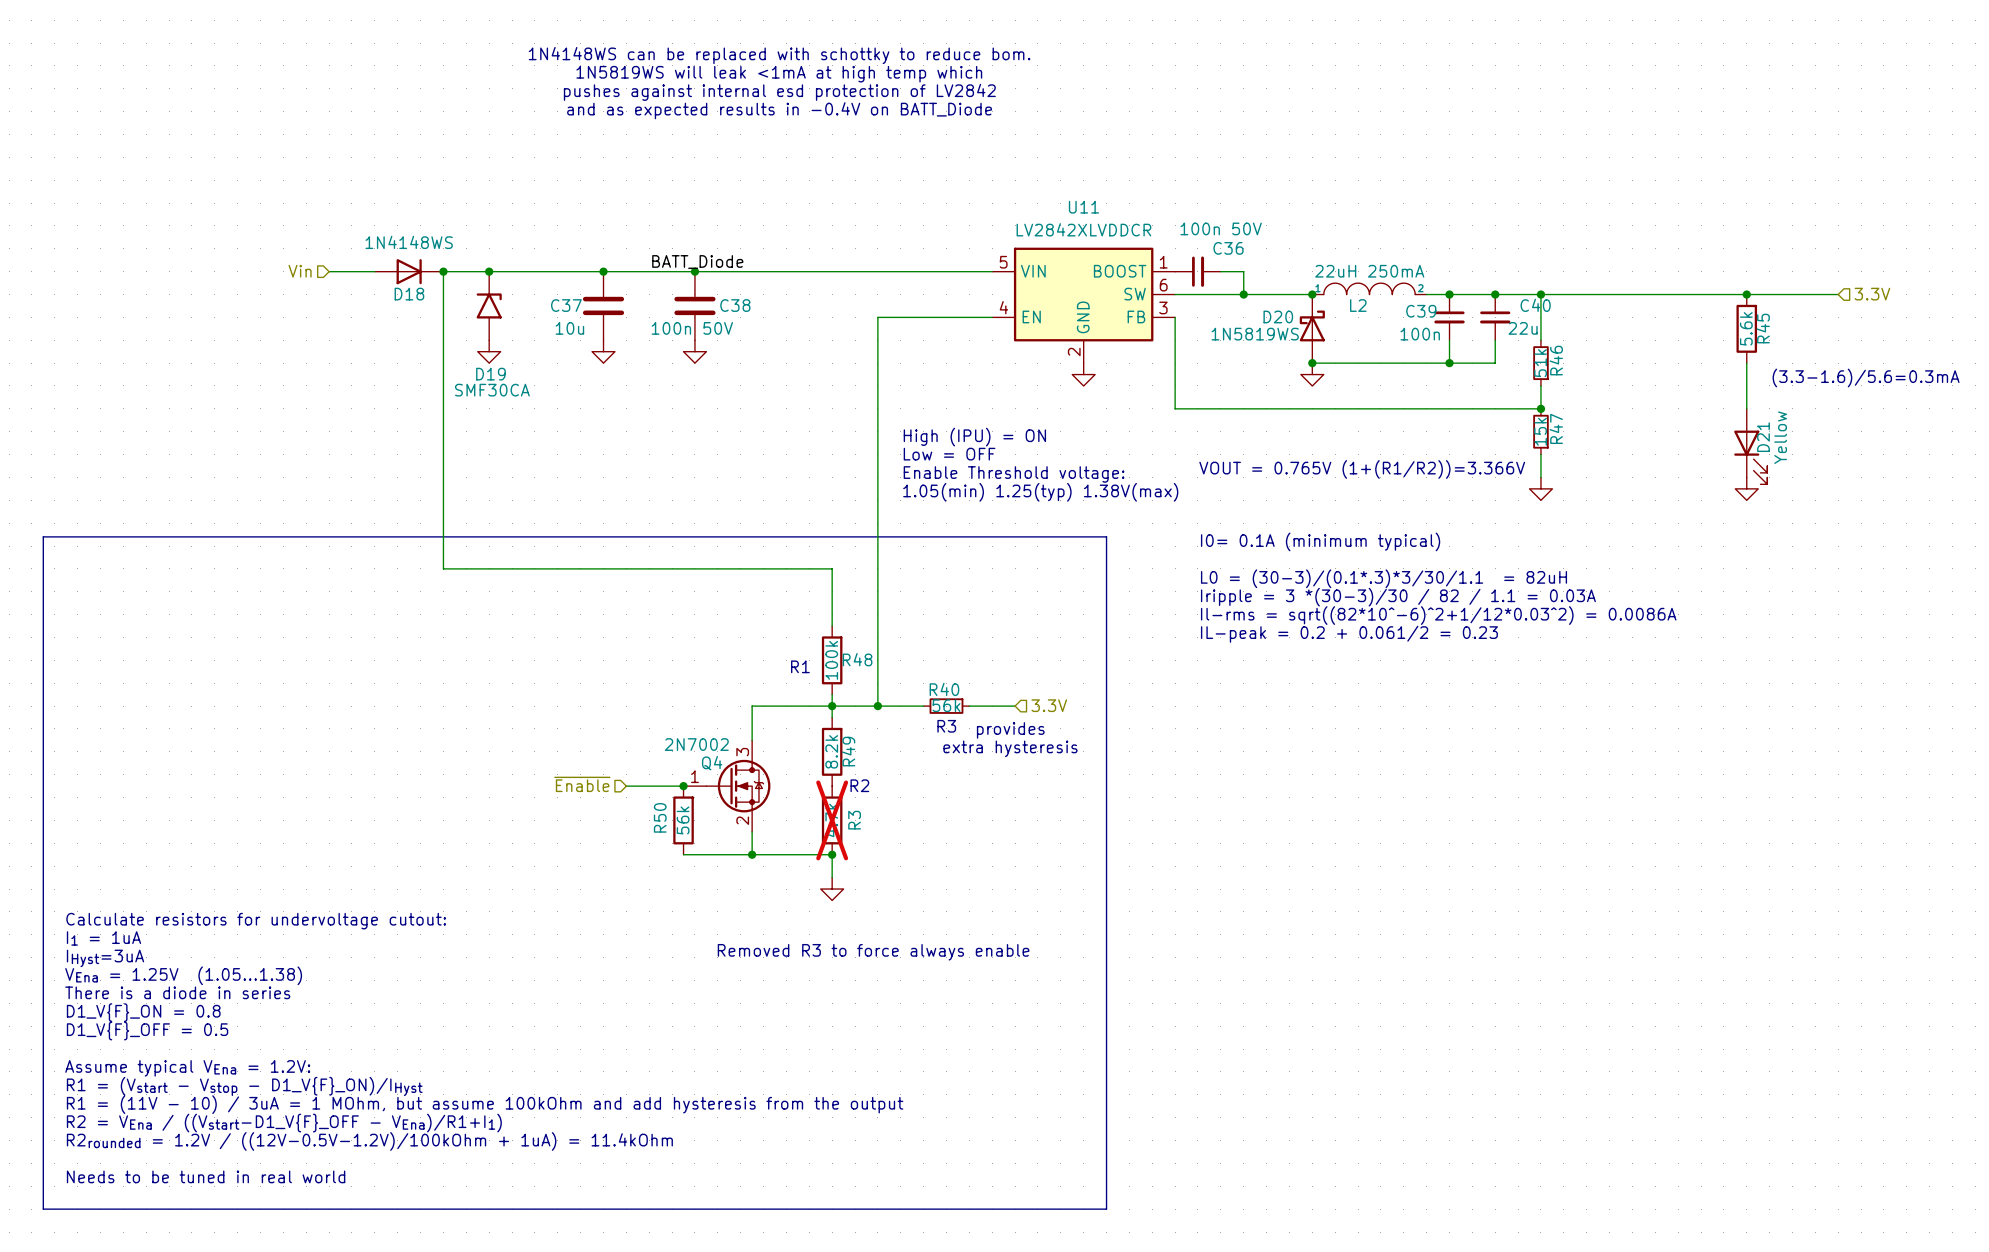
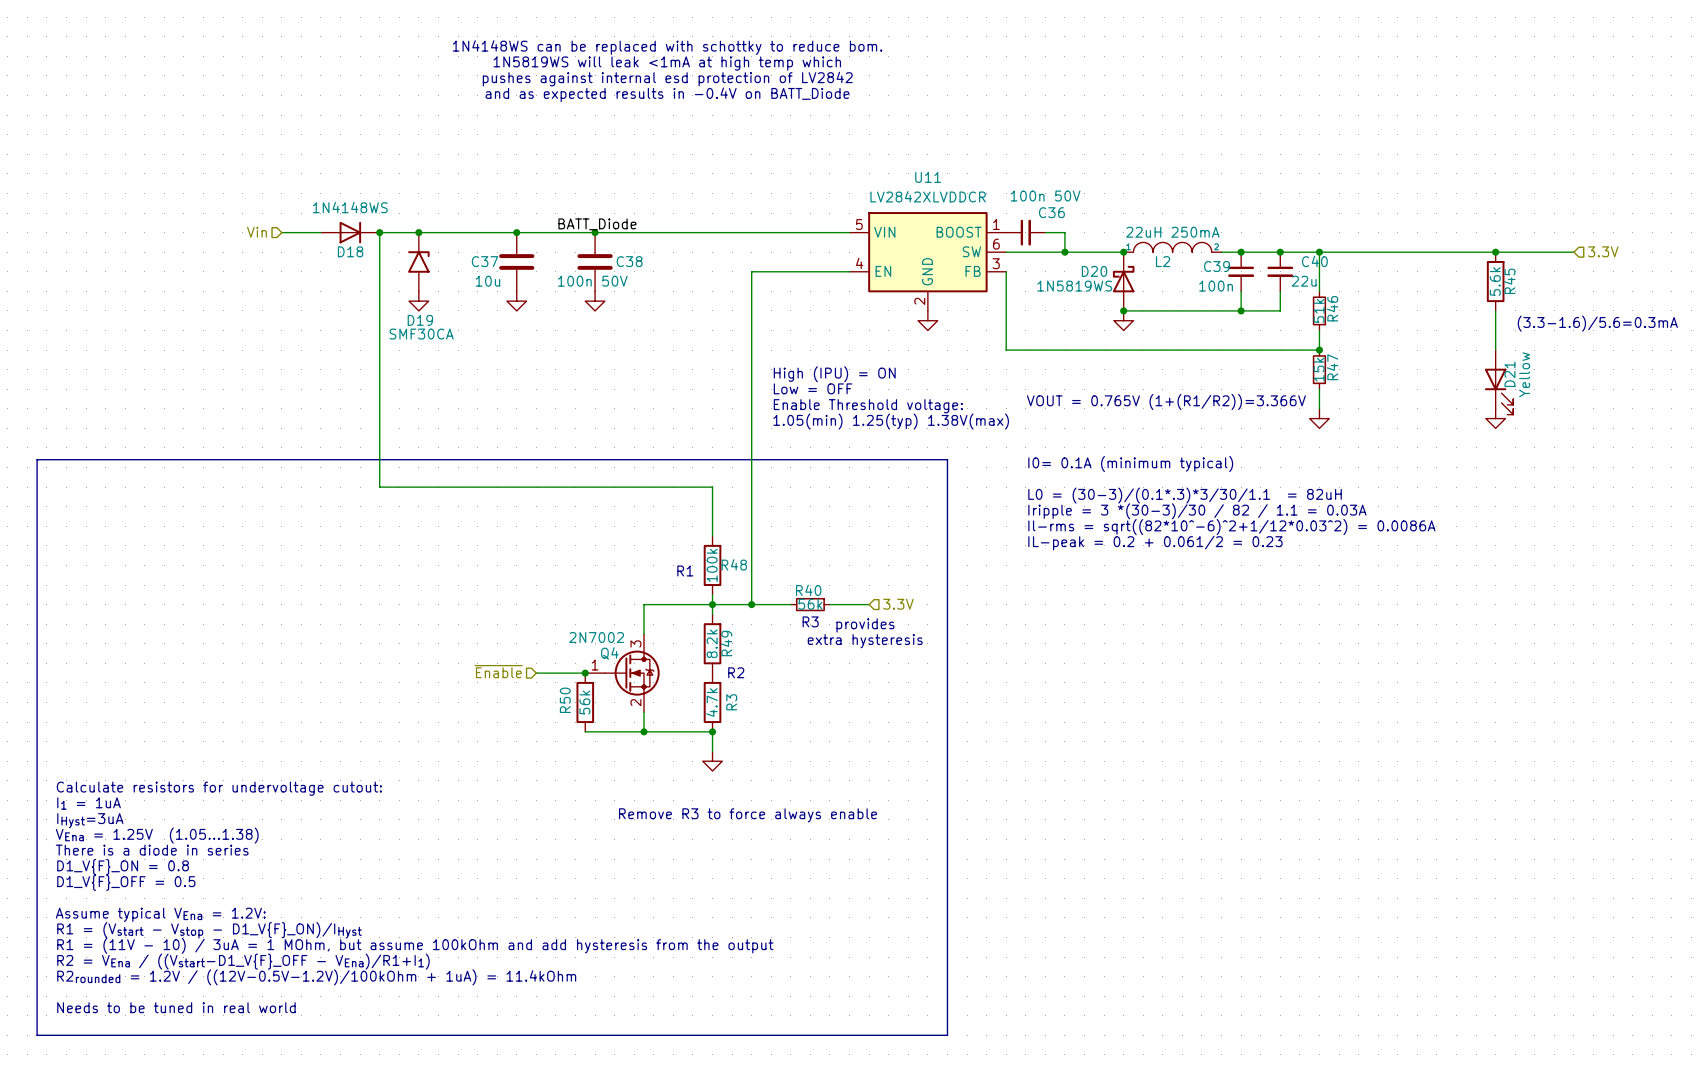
R3 do-not-place cross: (832, 820) -> none
text: Removed R3 to force always enable (873, 952) -> Remove R3 to force always enable (748, 815)

